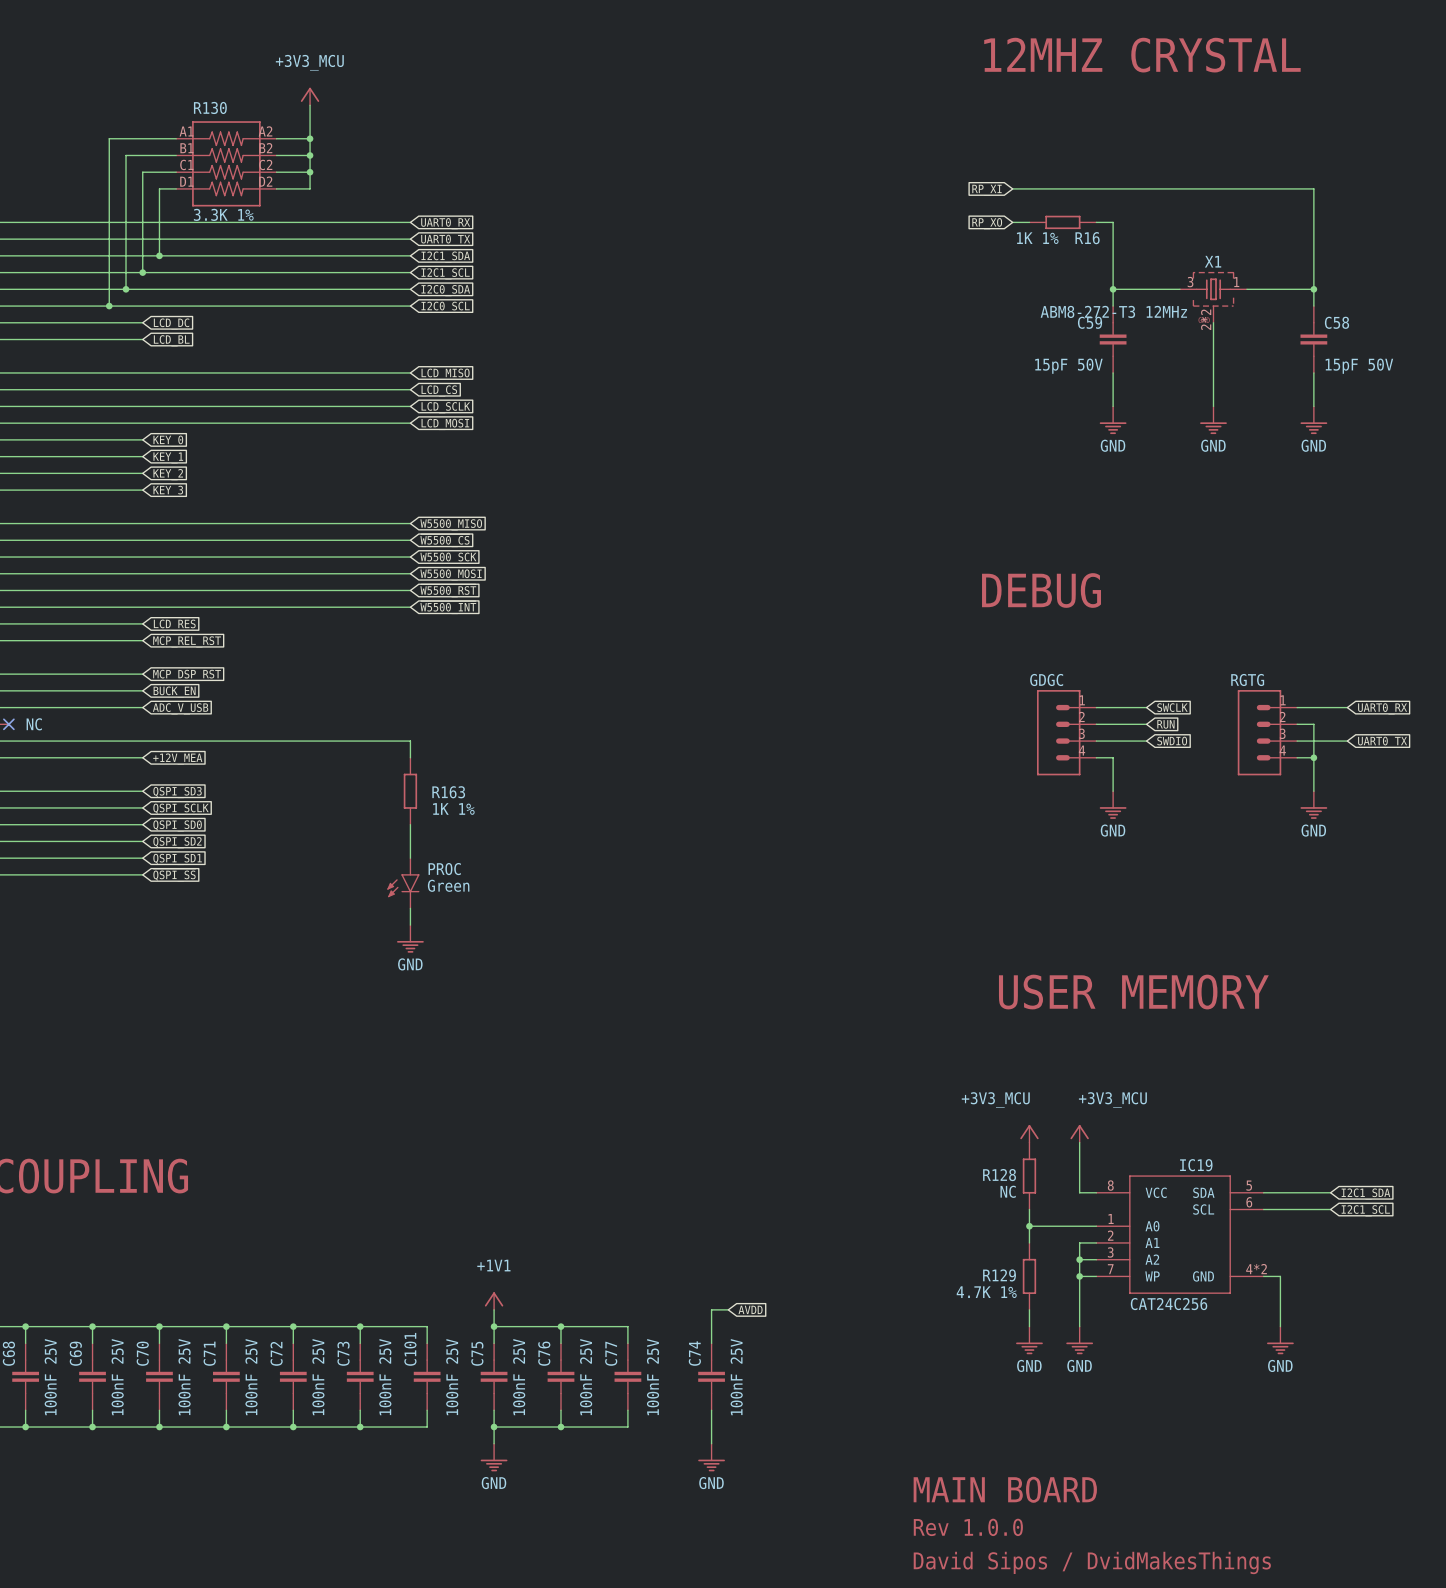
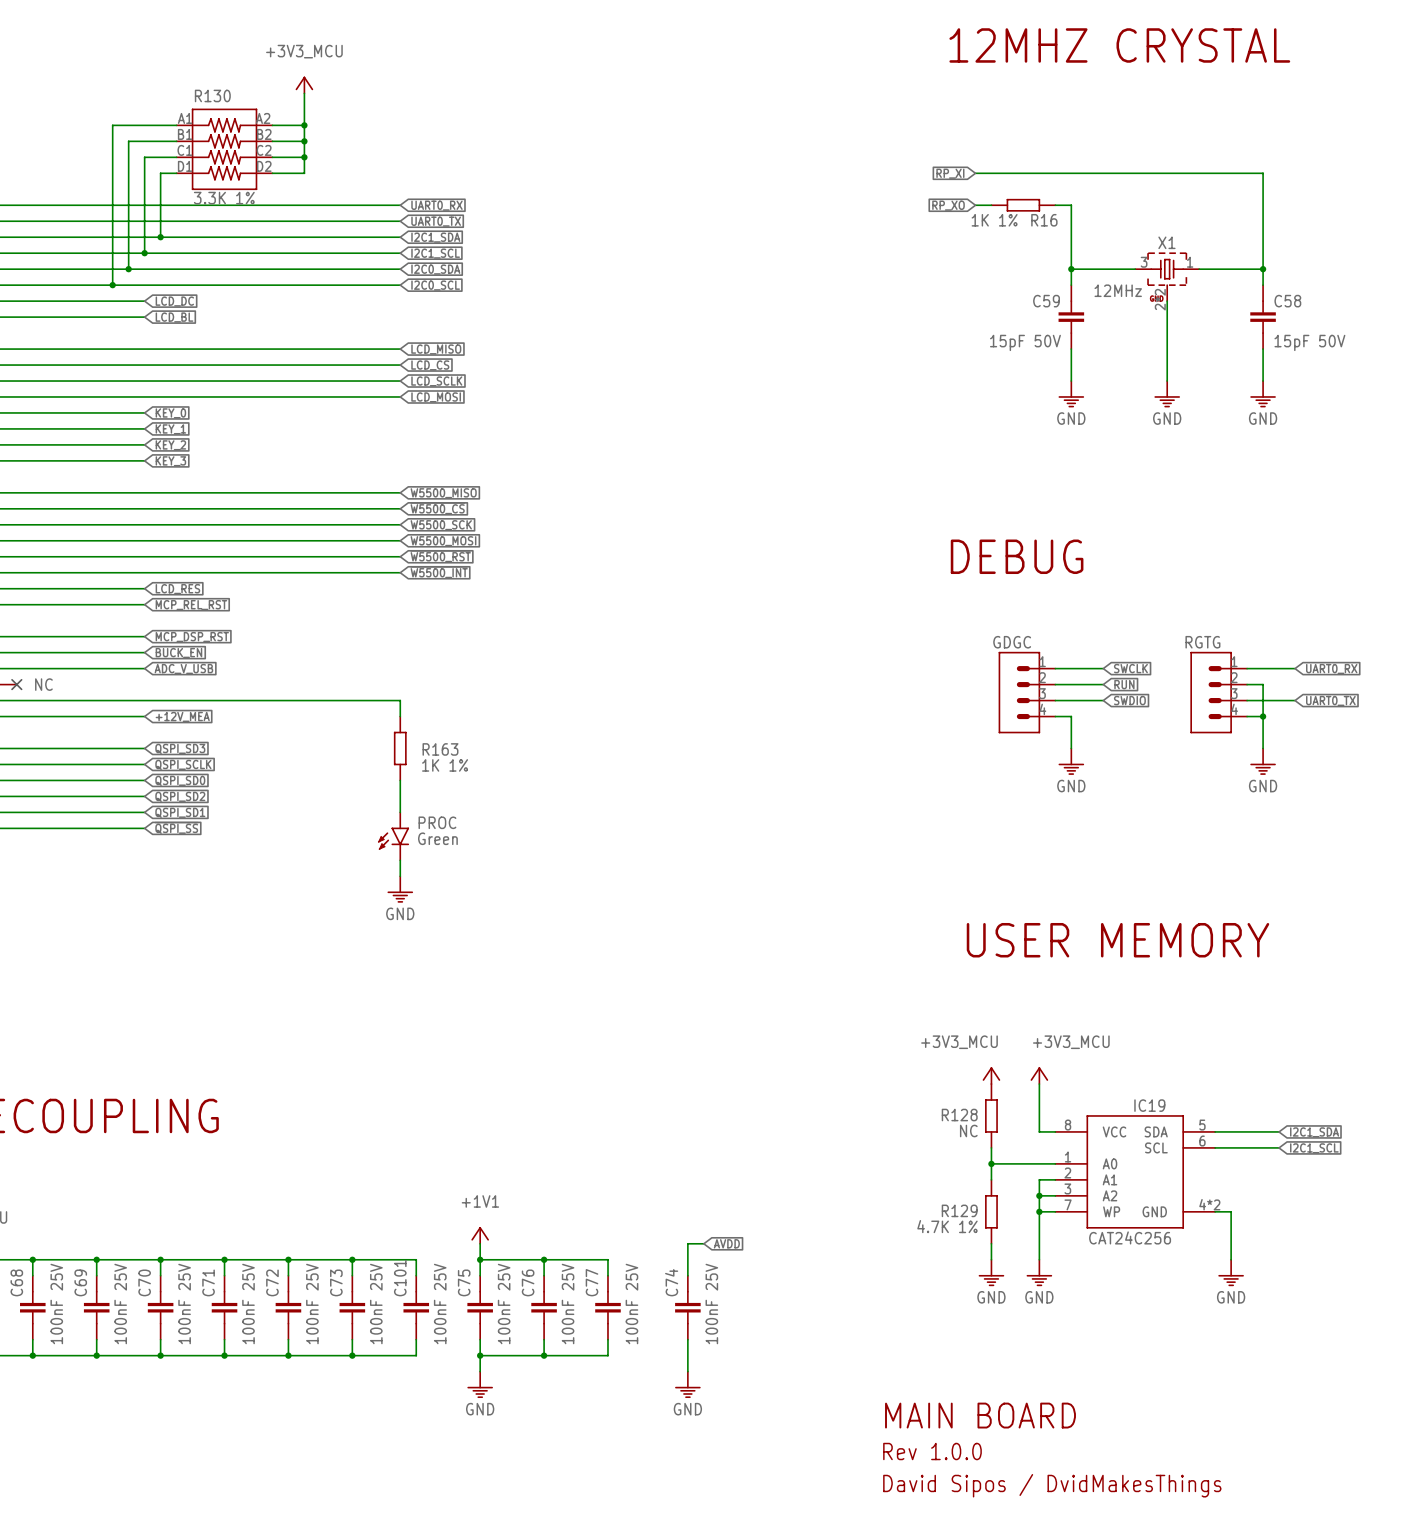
X1 value: ABM8-272-T3 12MHz (1113, 311) -> 12MHz (1118, 290)

